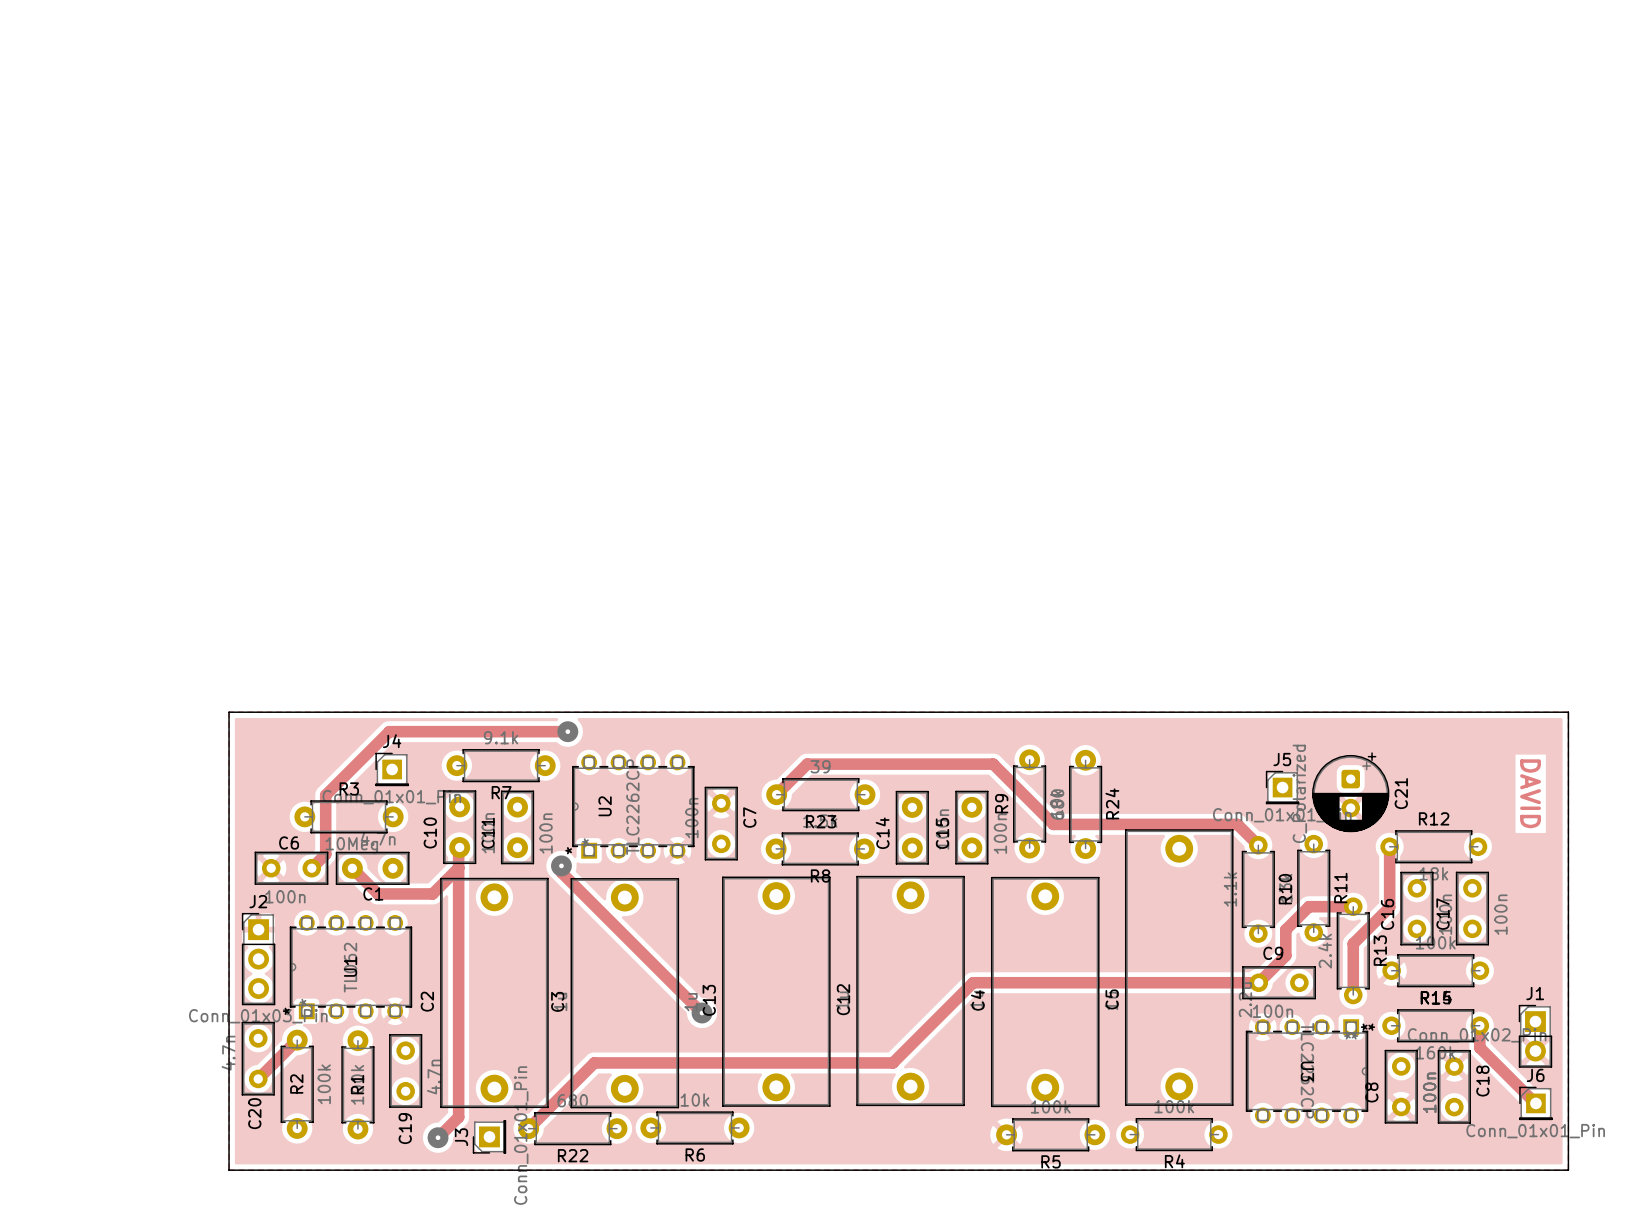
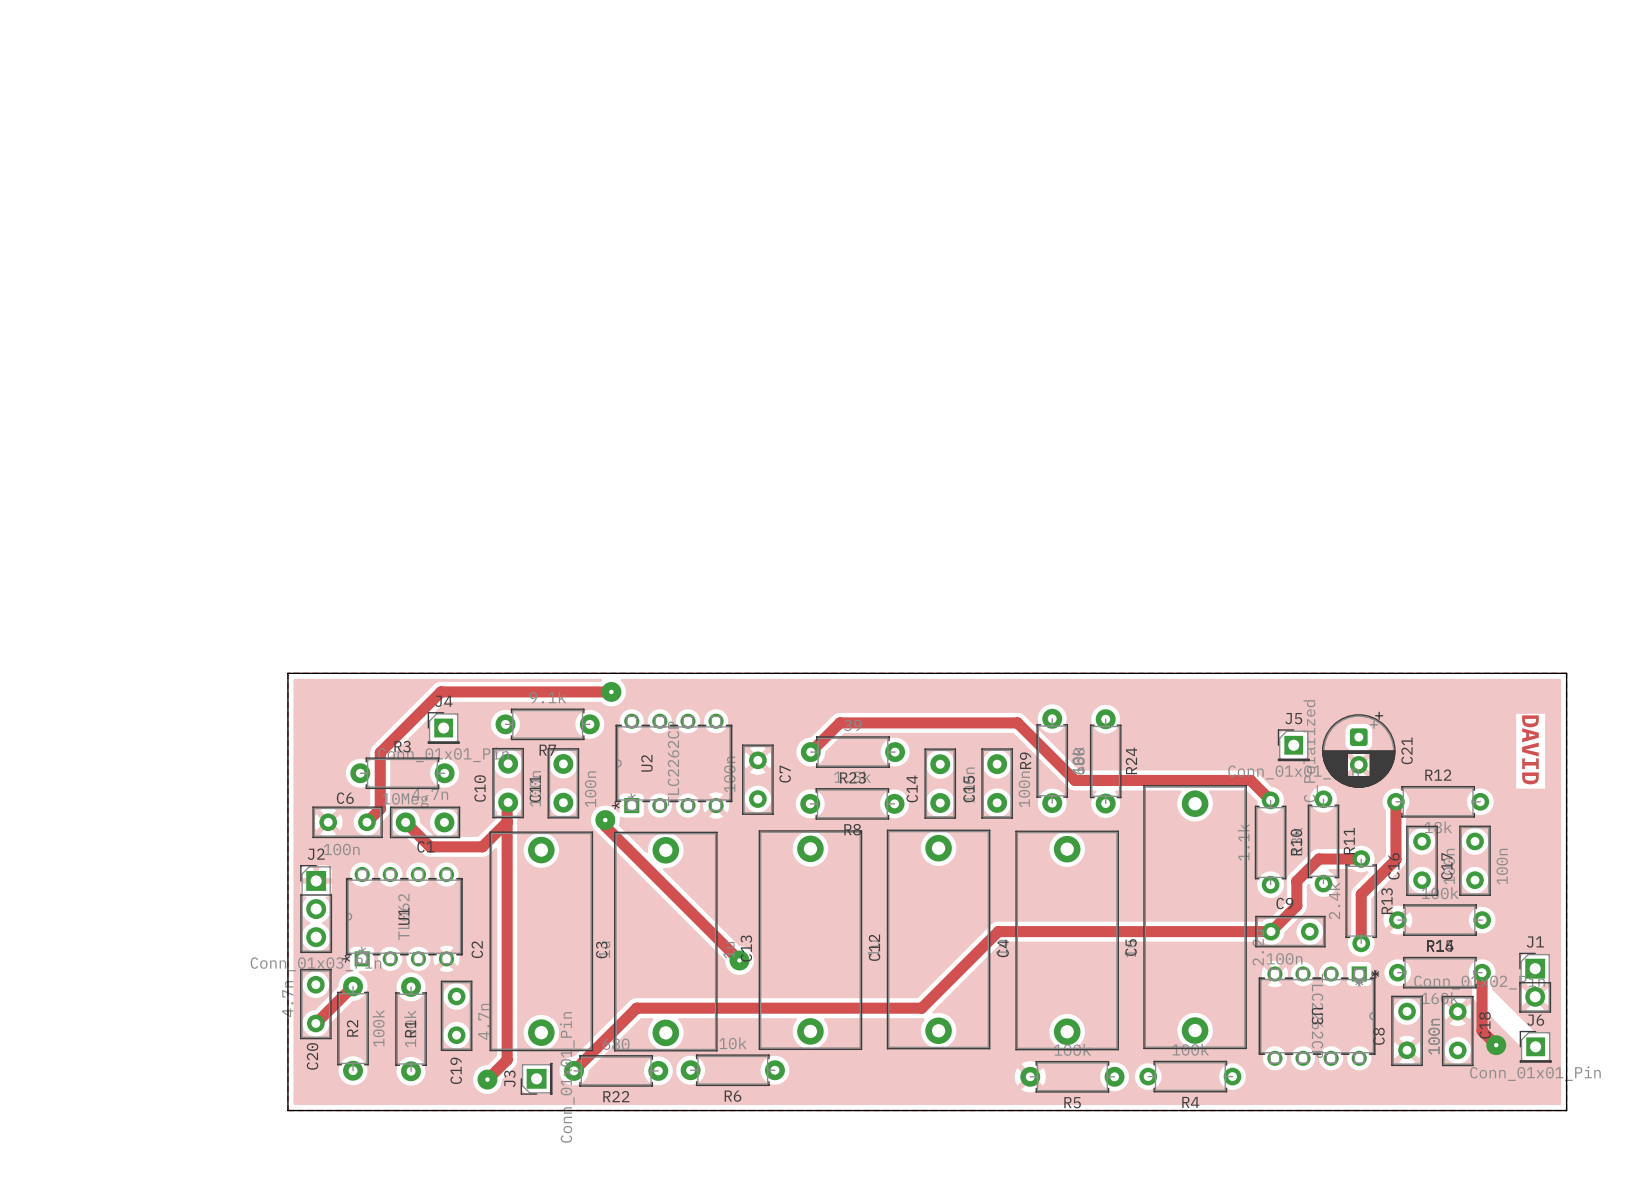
track: (1479, 1047) (1535, 1103) -> (1482, 993) (1482, 1030) (1496, 1045)
via: none -> (1496, 1045)

